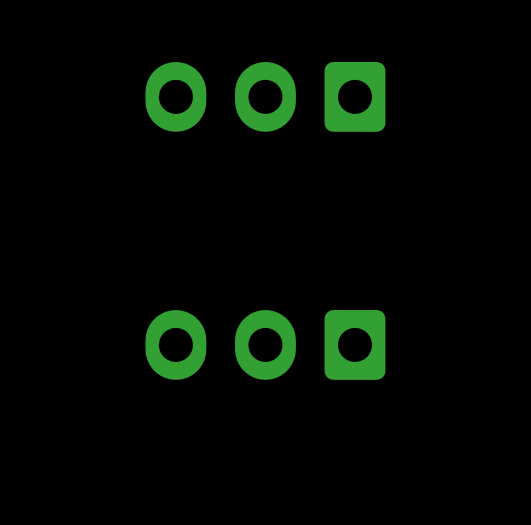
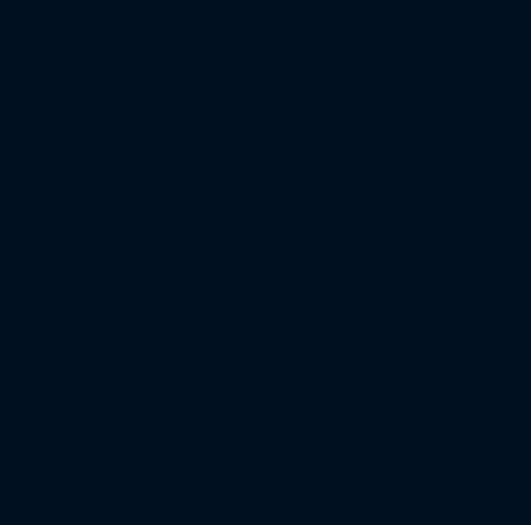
part: (265, 96) -> none
part: (265, 344) -> none

